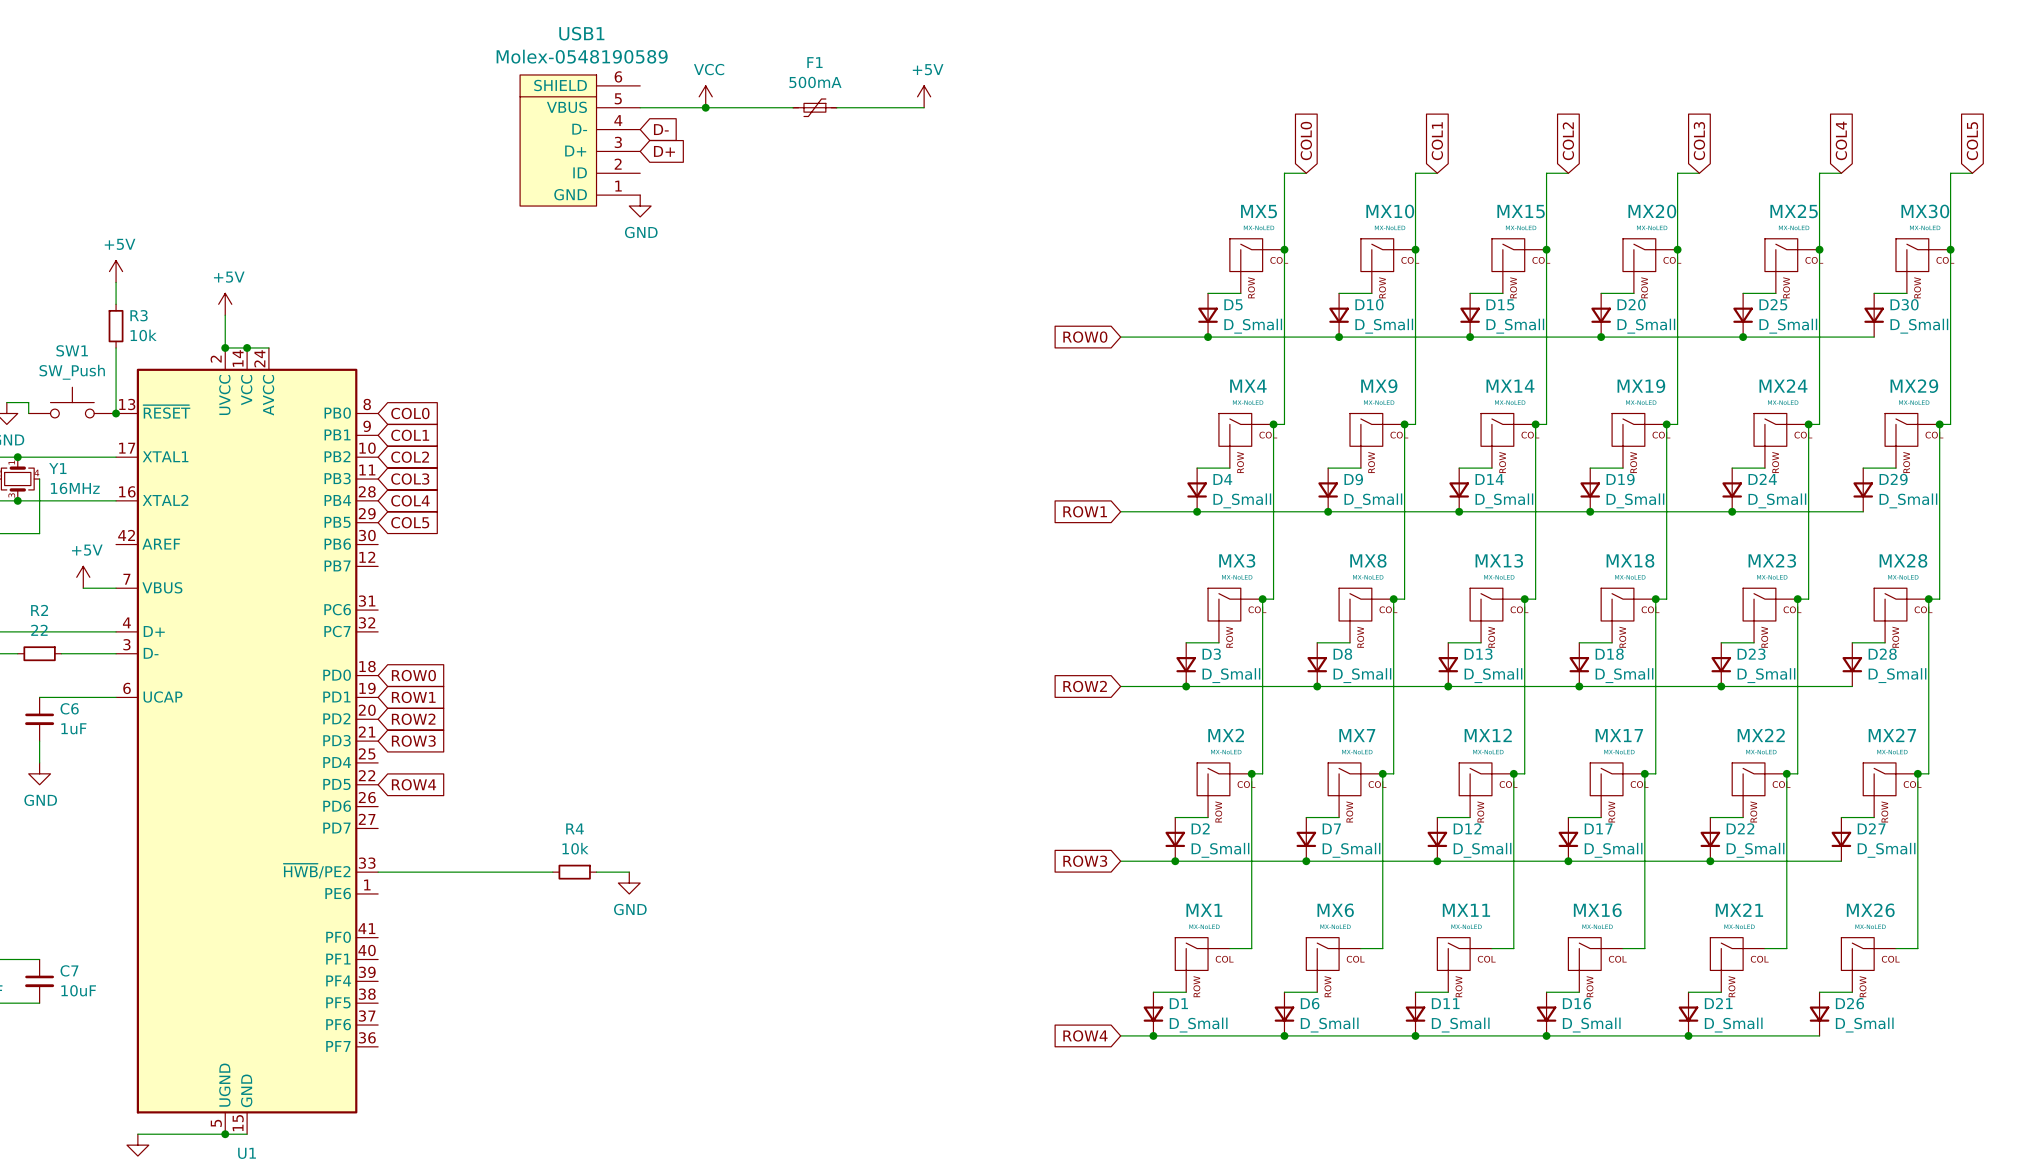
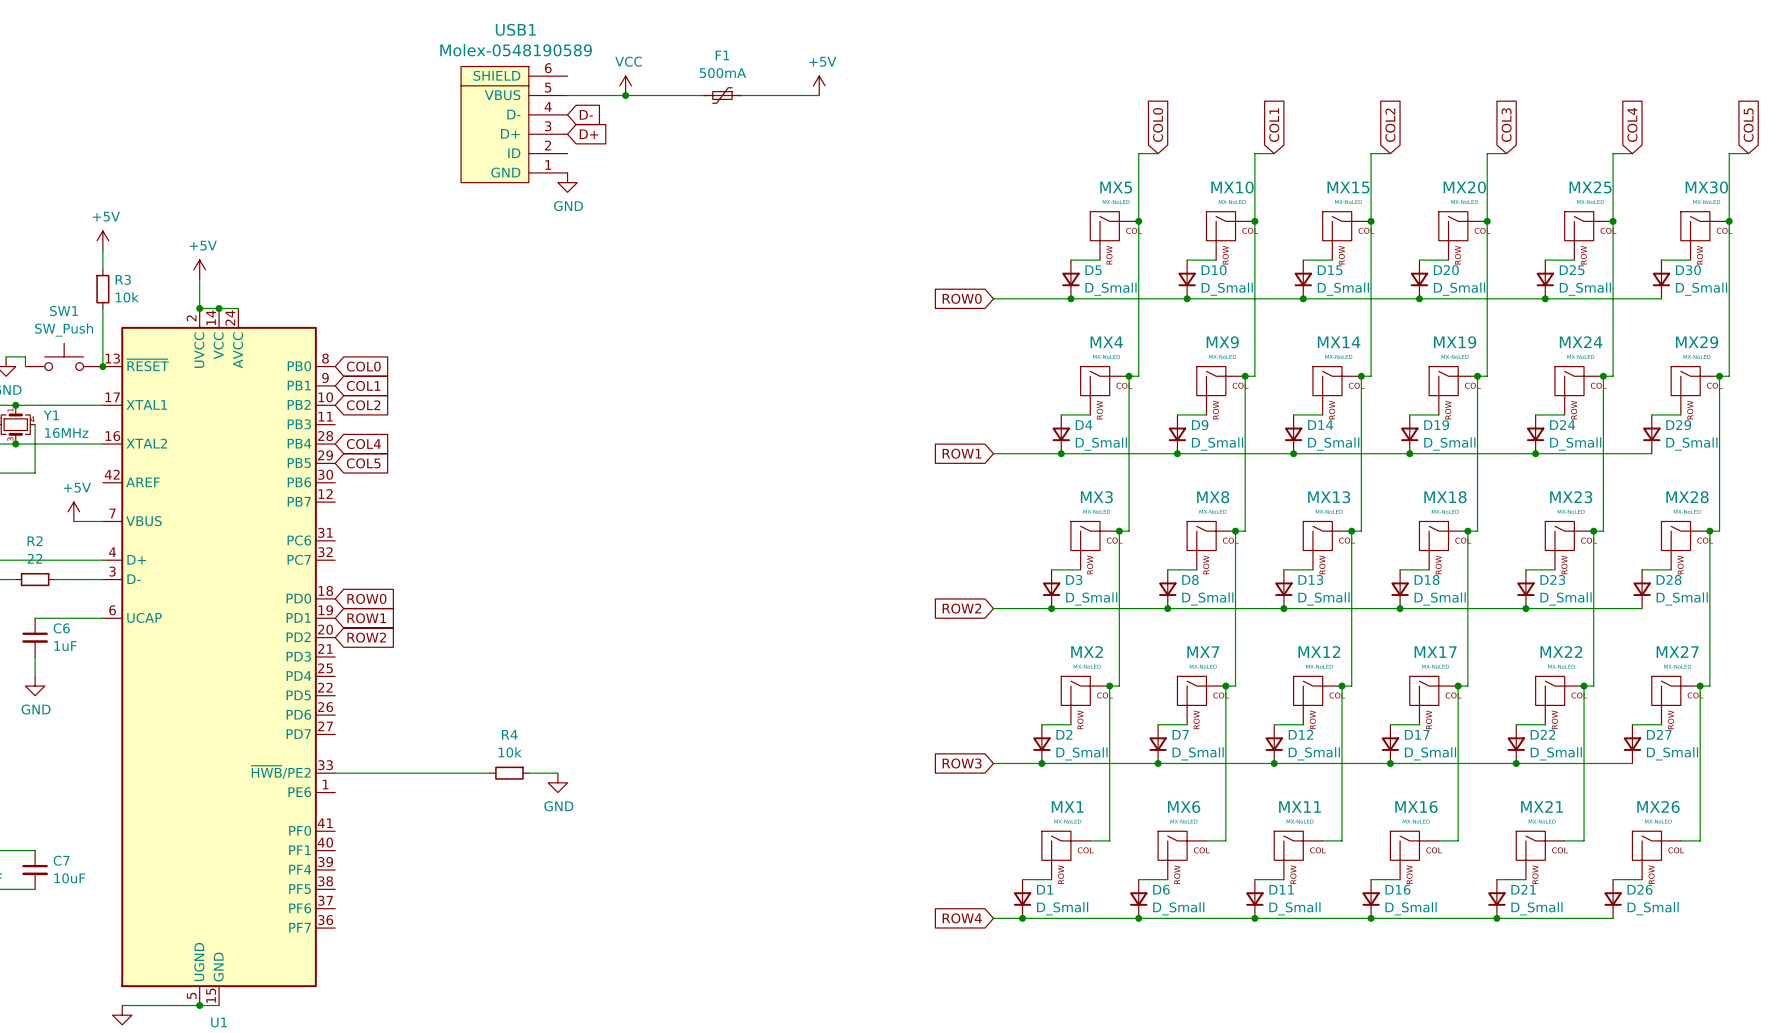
global label: COL3 (410, 479) -> none
global label: ROW3 (413, 741) -> none
global label: ROW4 (413, 784) -> none

